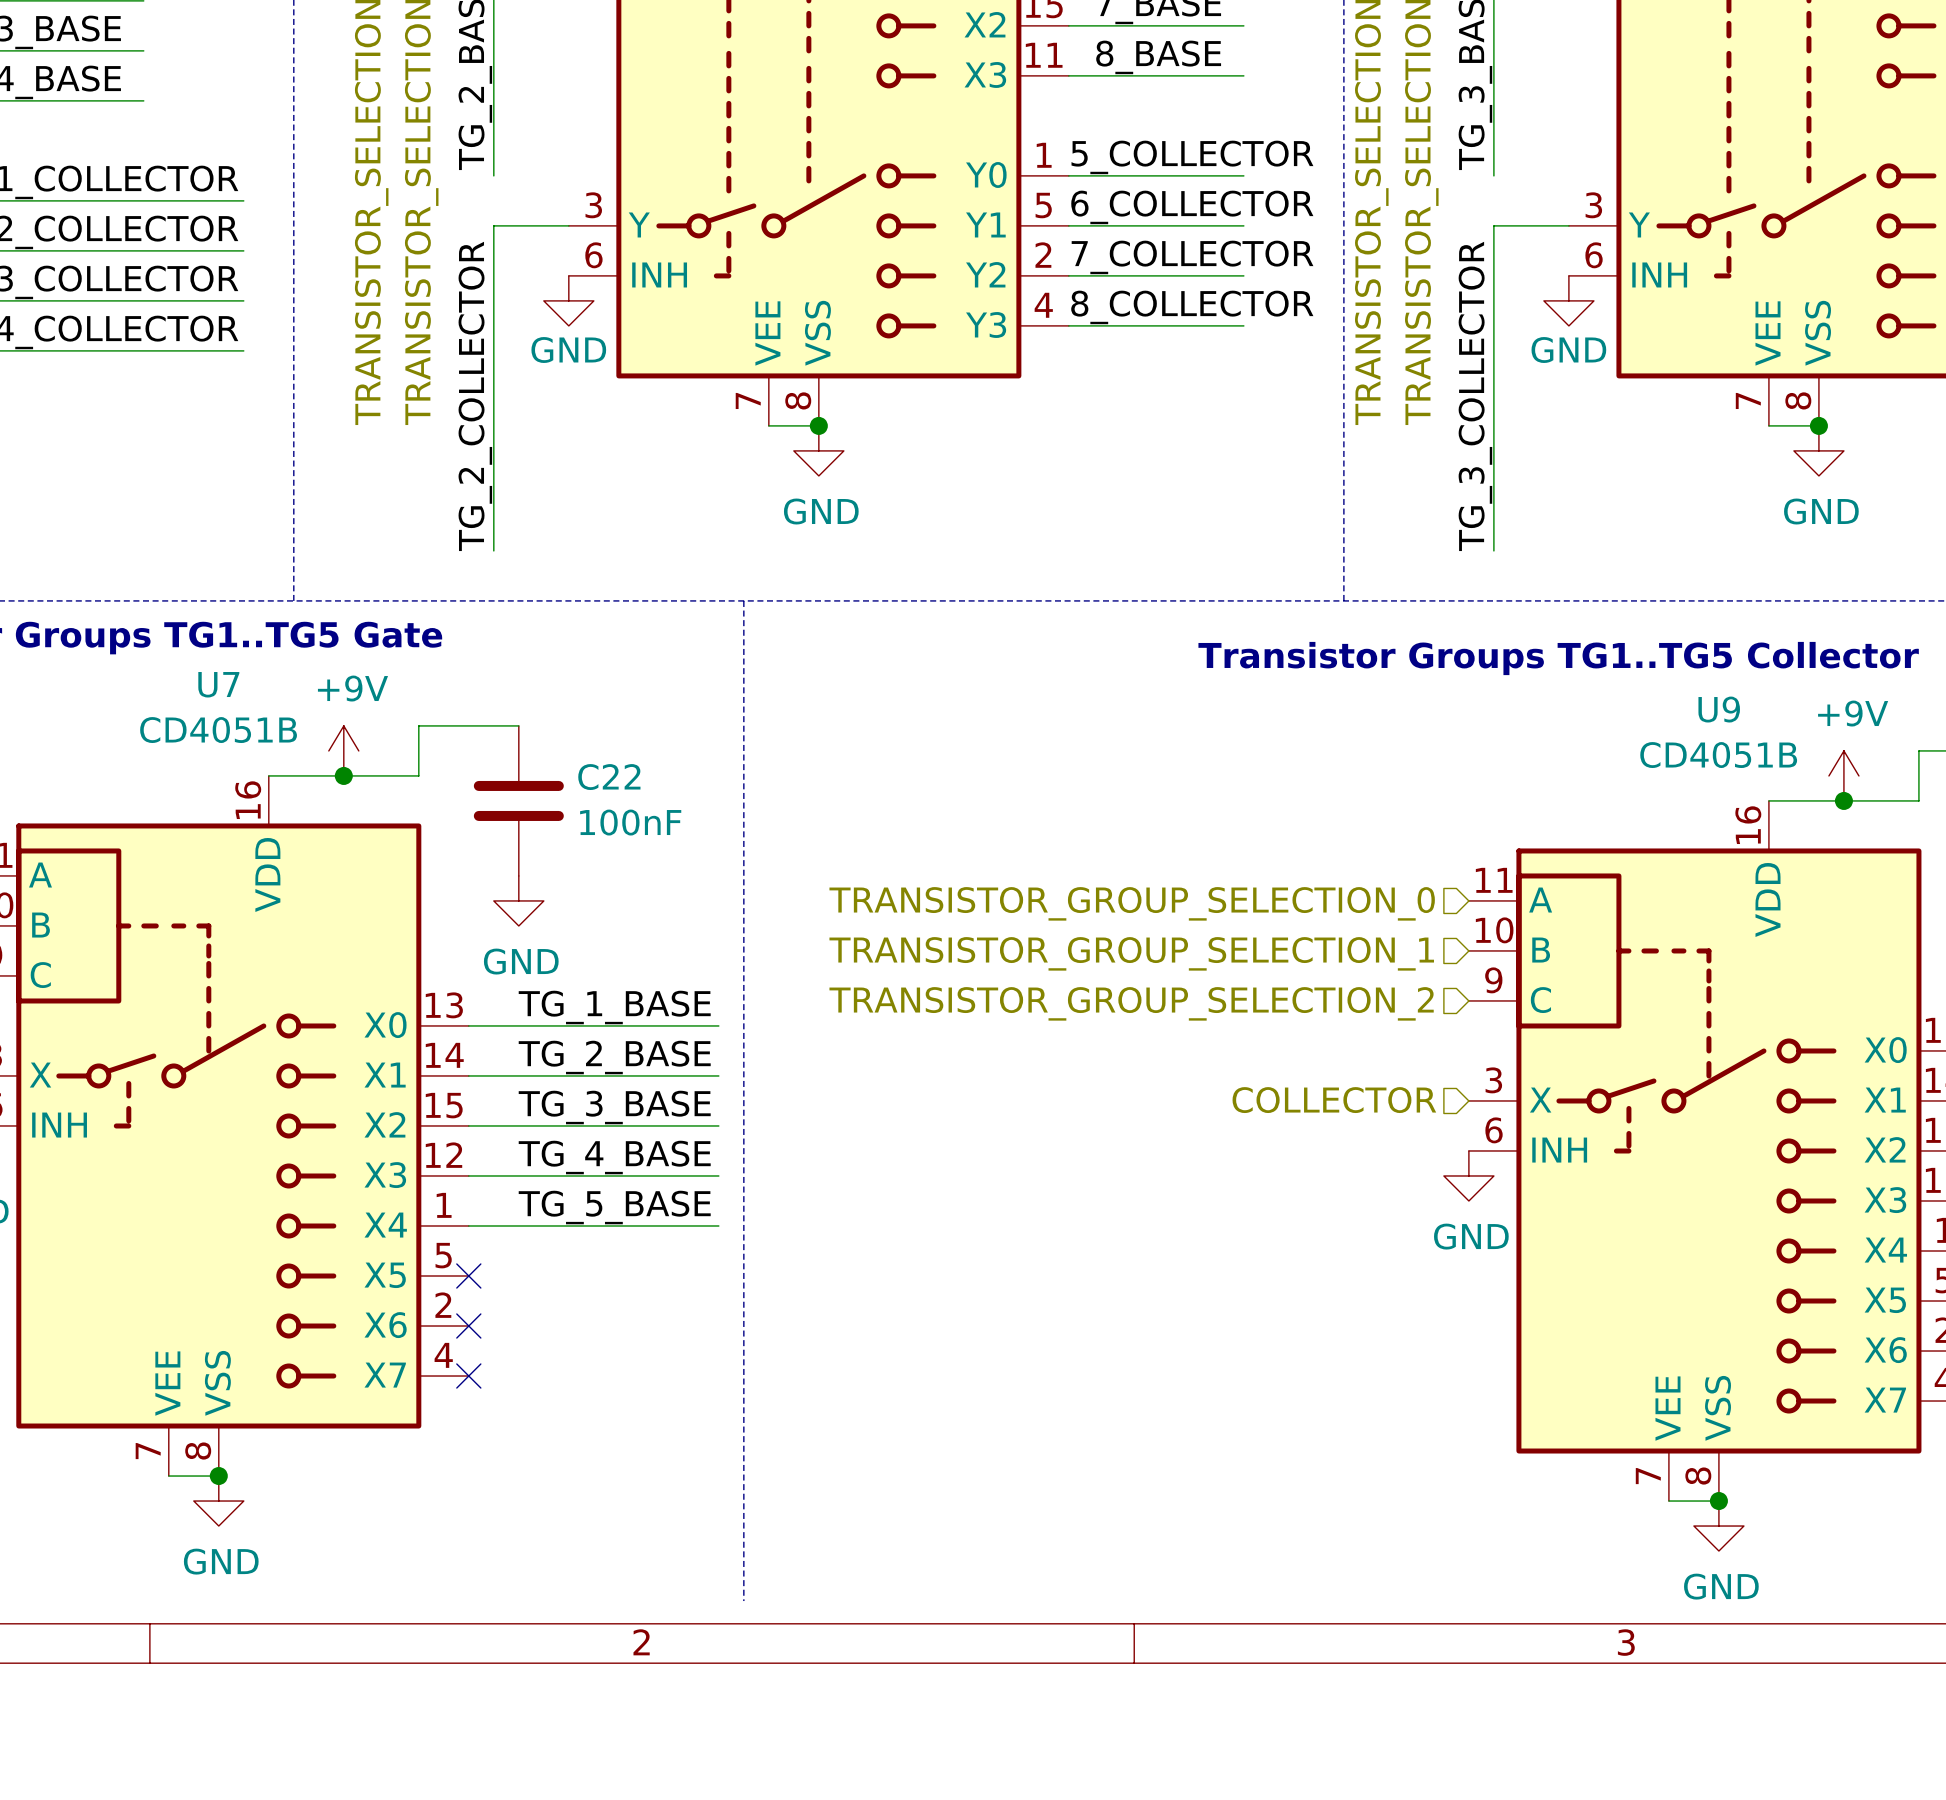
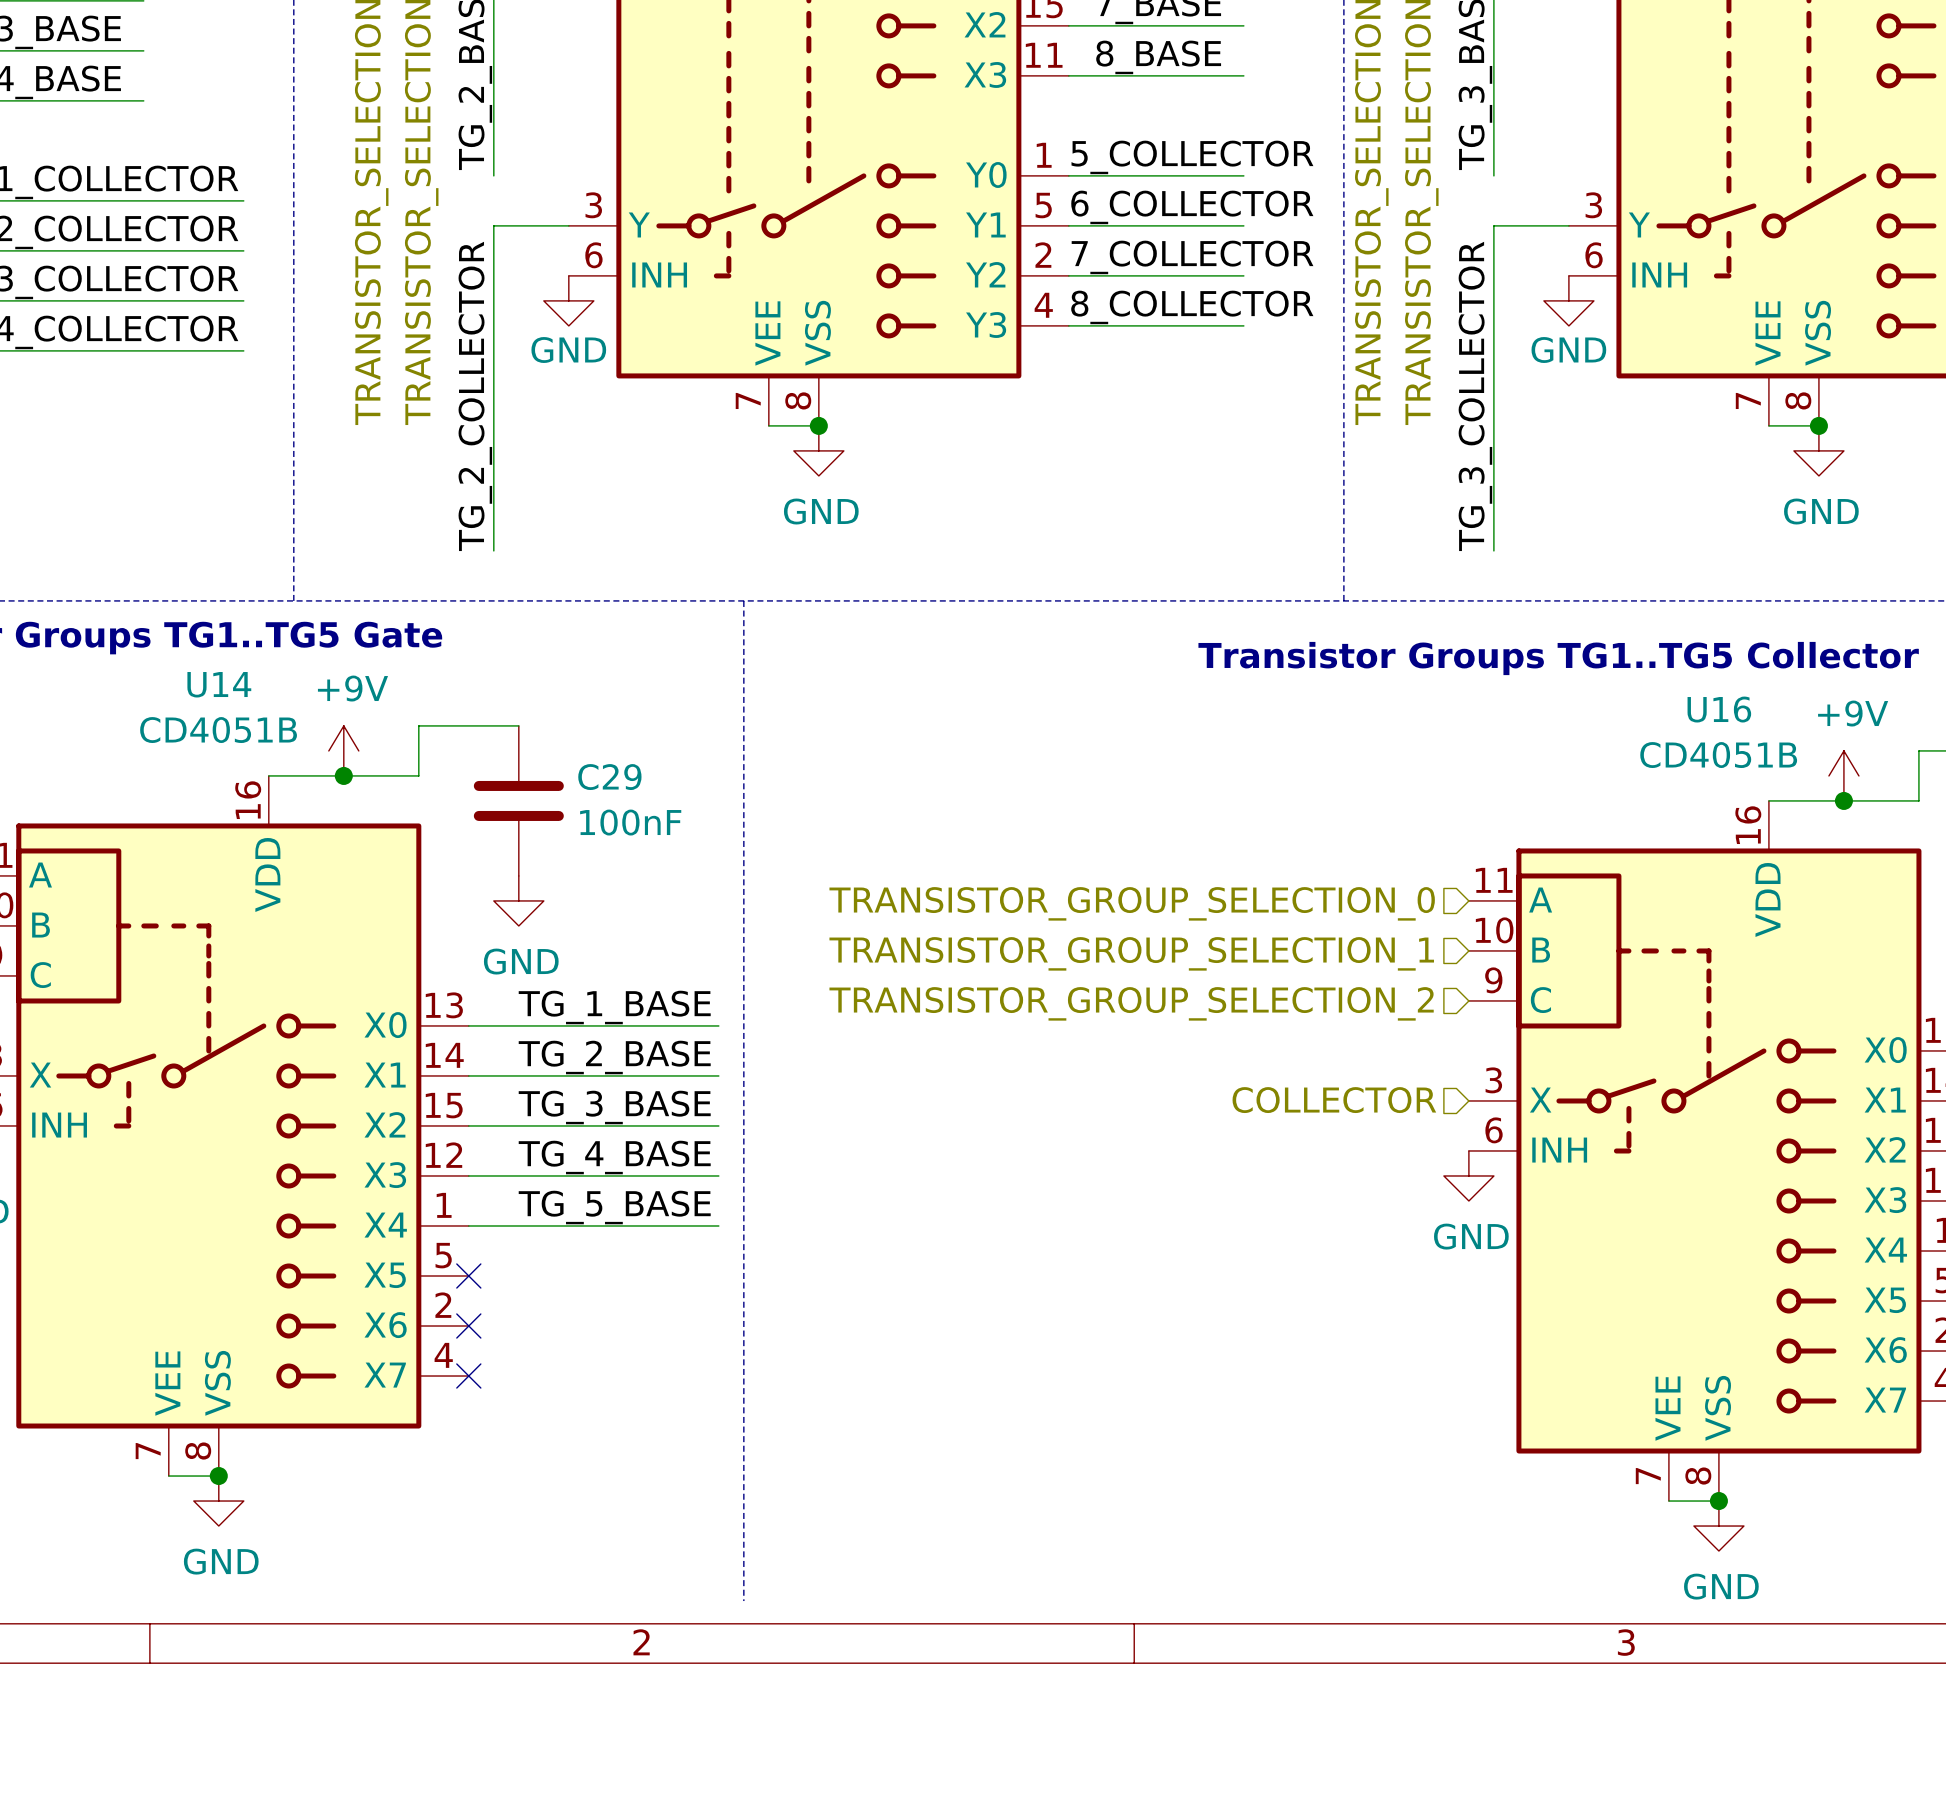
U7 name: U7 (218, 684) -> U14 (219, 684)
U9 name: U9 (1719, 709) -> U16 (1719, 709)
C22 name: C22 (609, 777) -> C29 (609, 777)

